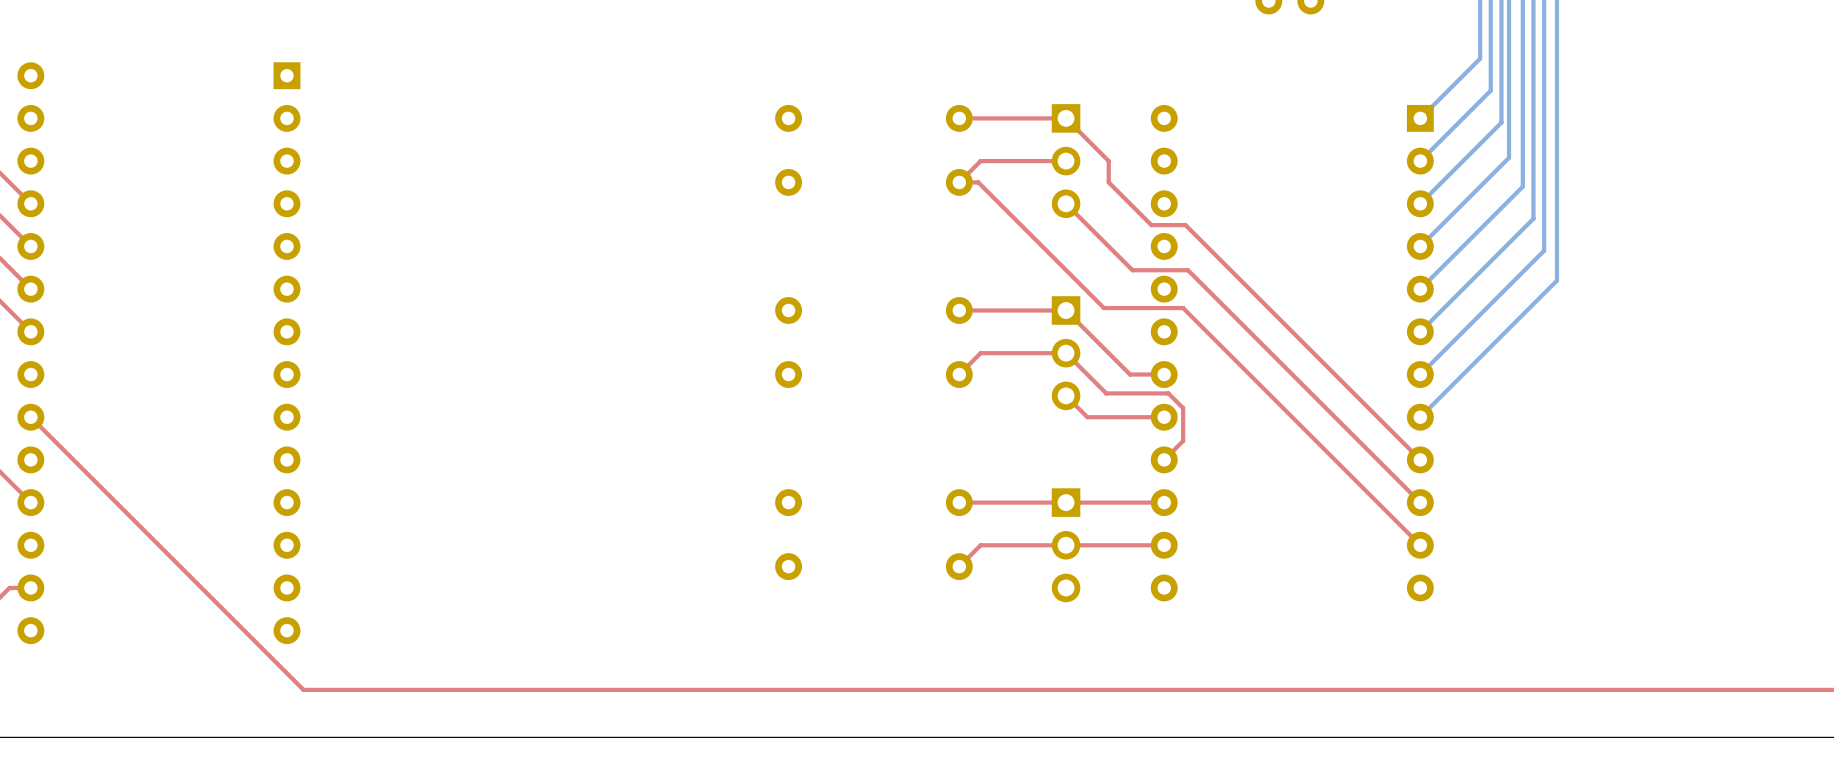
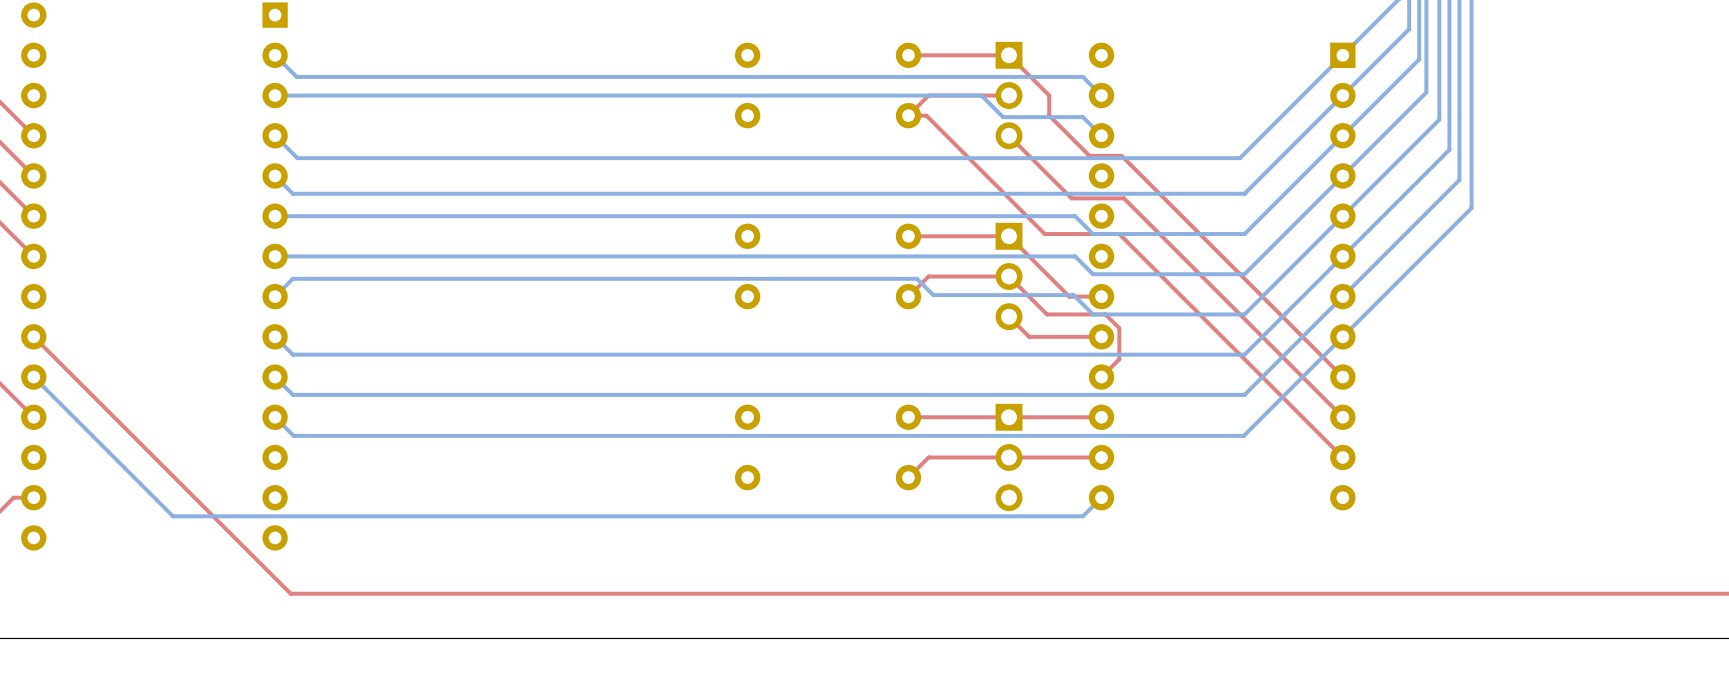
bottom track: none -> (275, 55) (296, 76) (1082, 76) (1101, 95)
bottom track: none -> (1342, 55) (1239, 158) (297, 158) (275, 135)
bottom track: none -> (275, 95) (981, 95) (1003, 117) (1082, 117) (1101, 135)
bottom track: none -> (1342, 95) (1244, 193) (292, 193) (275, 175)
bottom track: none -> (1342, 135) (1244, 234) (1092, 234) (1075, 216) (275, 216)
bottom track: none -> (1342, 175) (1244, 274) (1092, 274) (1075, 256) (275, 256)
bottom track: none -> (1342, 216) (1244, 314) (1092, 314) (1073, 295) (933, 295) (917, 278) (292, 278) (275, 296)
bottom track: none -> (1342, 256) (1244, 354) (292, 354) (275, 336)
bottom track: none -> (1342, 296) (1244, 394) (292, 394) (275, 377)
bottom track: none -> (1342, 336) (1243, 435) (293, 435) (275, 417)
bottom track: none -> (33, 377) (173, 516) (1082, 516) (1101, 497)

